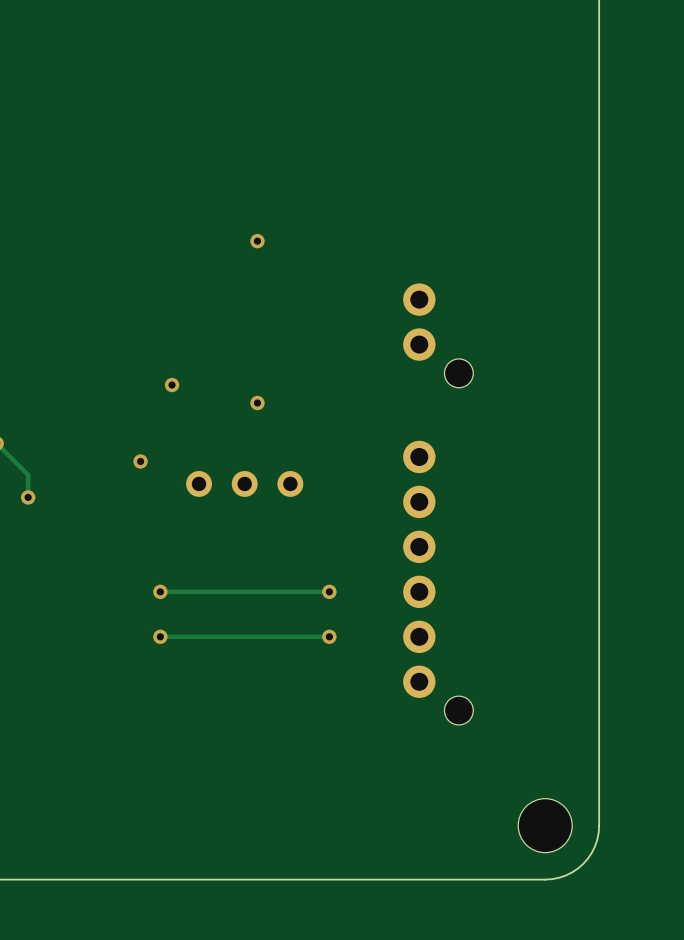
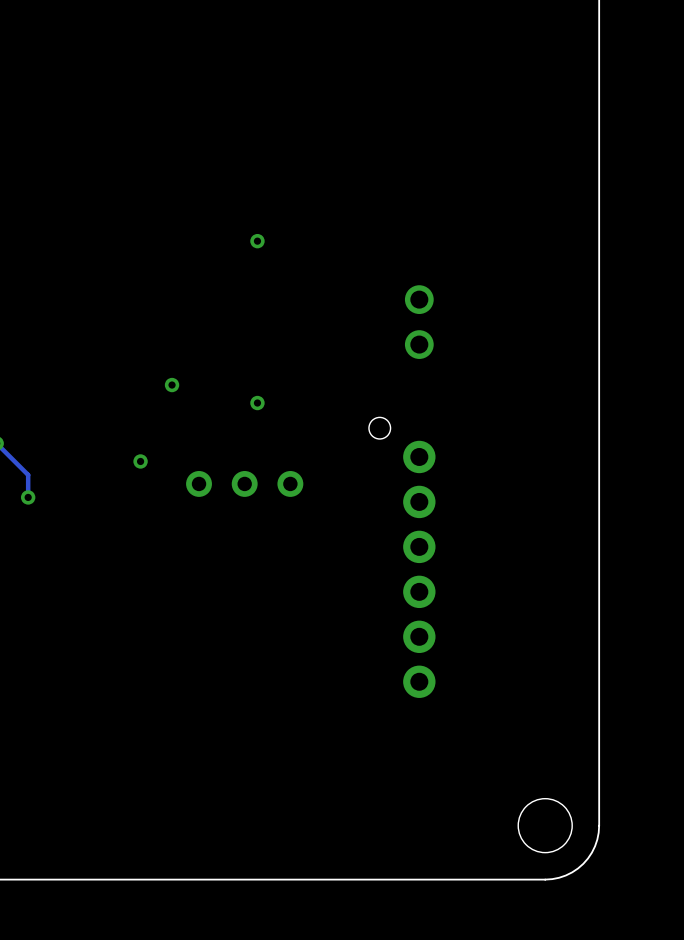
part: none -> (419, 322)
part: (438, 335) -> none
part: none -> (402, 557)
part: (438, 582) -> none
via: (160, 591) -> none
track: (329, 591) (160, 591) -> none
via: (329, 591) -> none
via: (160, 636) -> none
track: (329, 636) (160, 636) -> none
via: (329, 636) -> none

